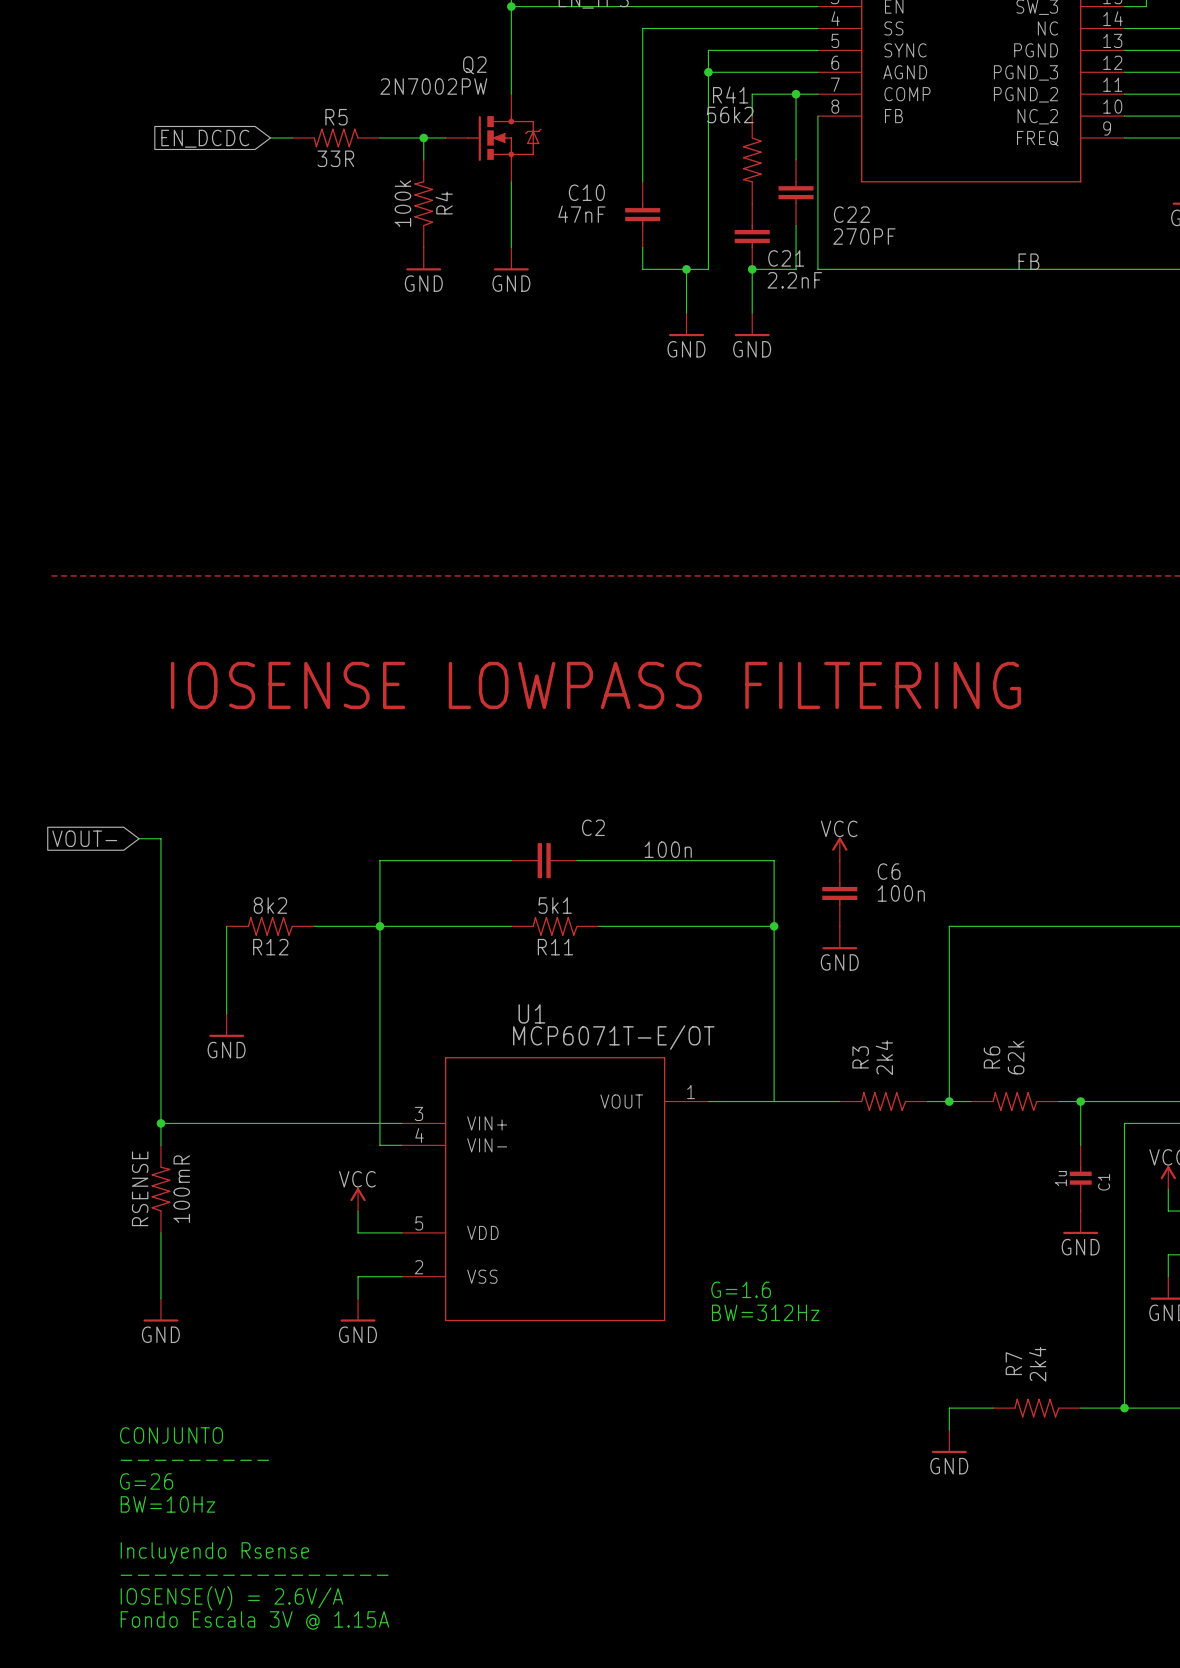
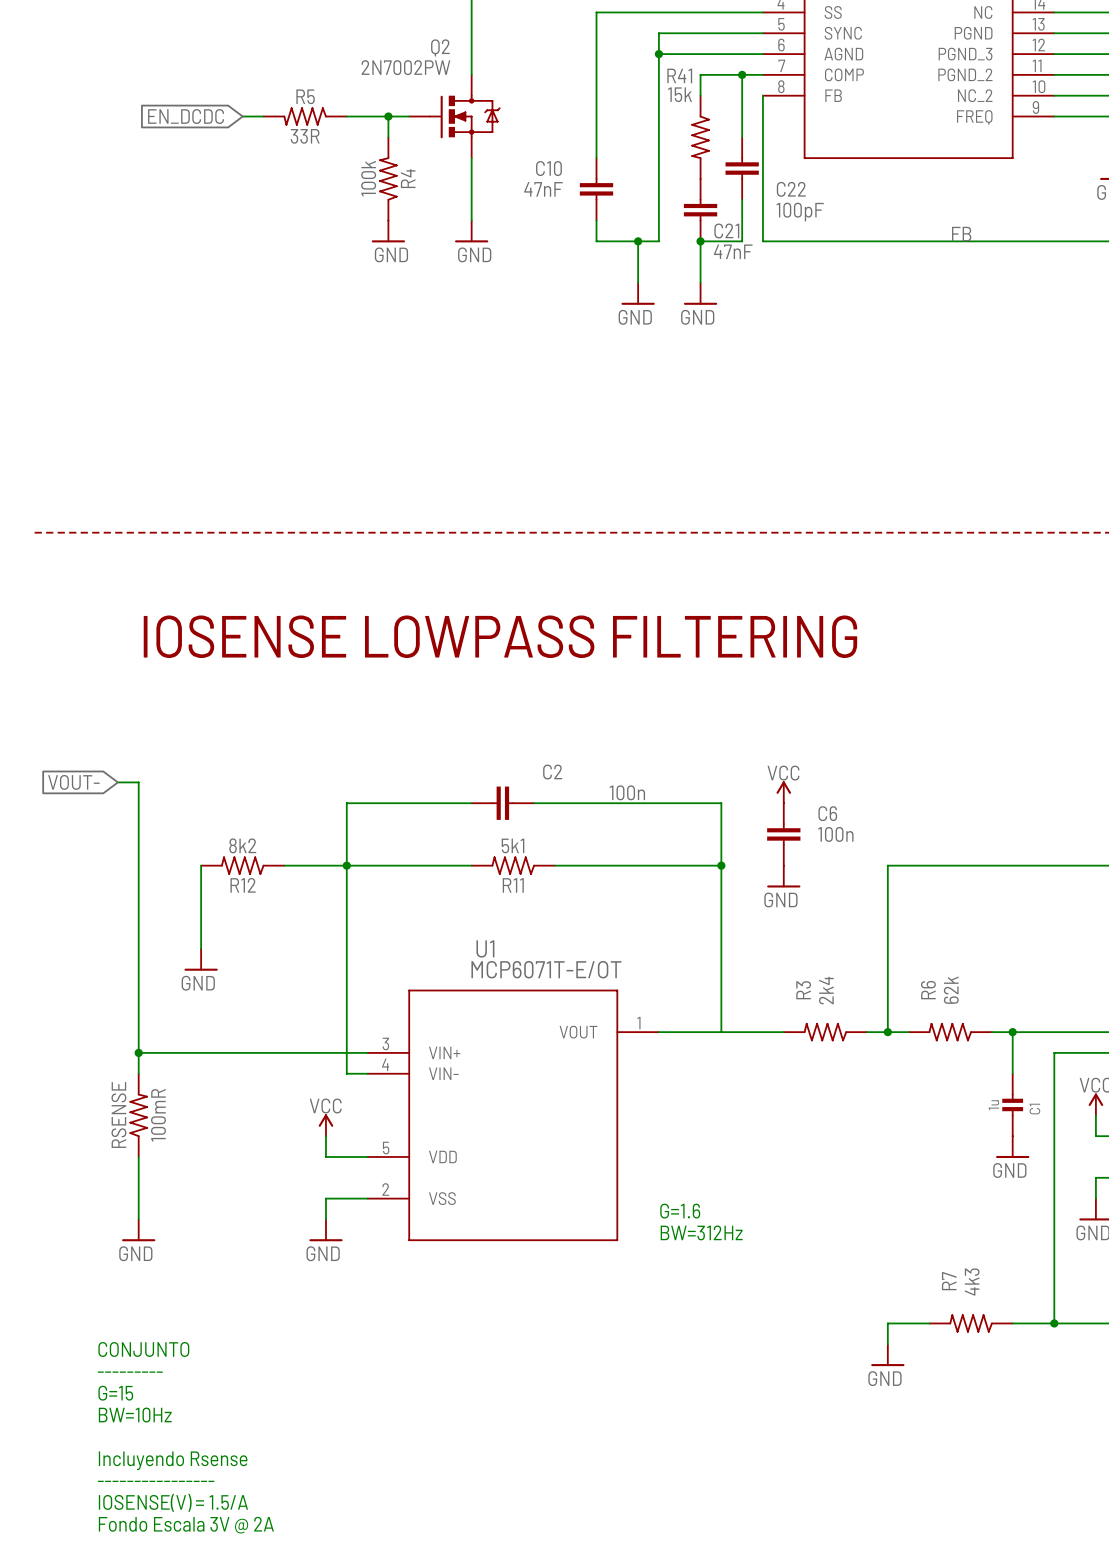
R41 value: 56k2 (730, 114) -> 15k (680, 94)
C22 value: 270PF (864, 236) -> 100pF (800, 212)
C21 value: 2.2nF (794, 280) -> 47nF (733, 251)
R7 value: 2k4 (1037, 1364) -> 4k3 (972, 1281)
text: G=26 (146, 1481) -> G=15 (115, 1393)
text: IOSENSE(V) = 2.6V/A (231, 1598) -> IOSENSE(V) = 1.5/A (173, 1502)
text: Fondo Escala 3V @ 1.15A (254, 1620) -> Fondo Escala 3V @ 2A (186, 1525)

